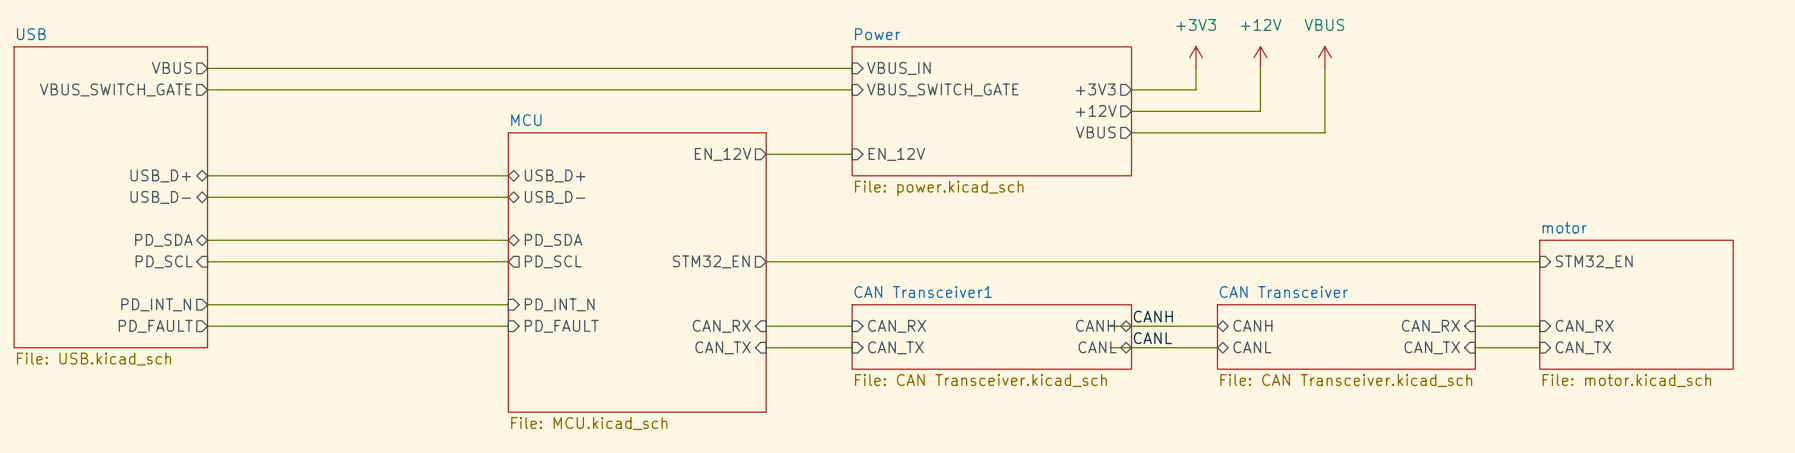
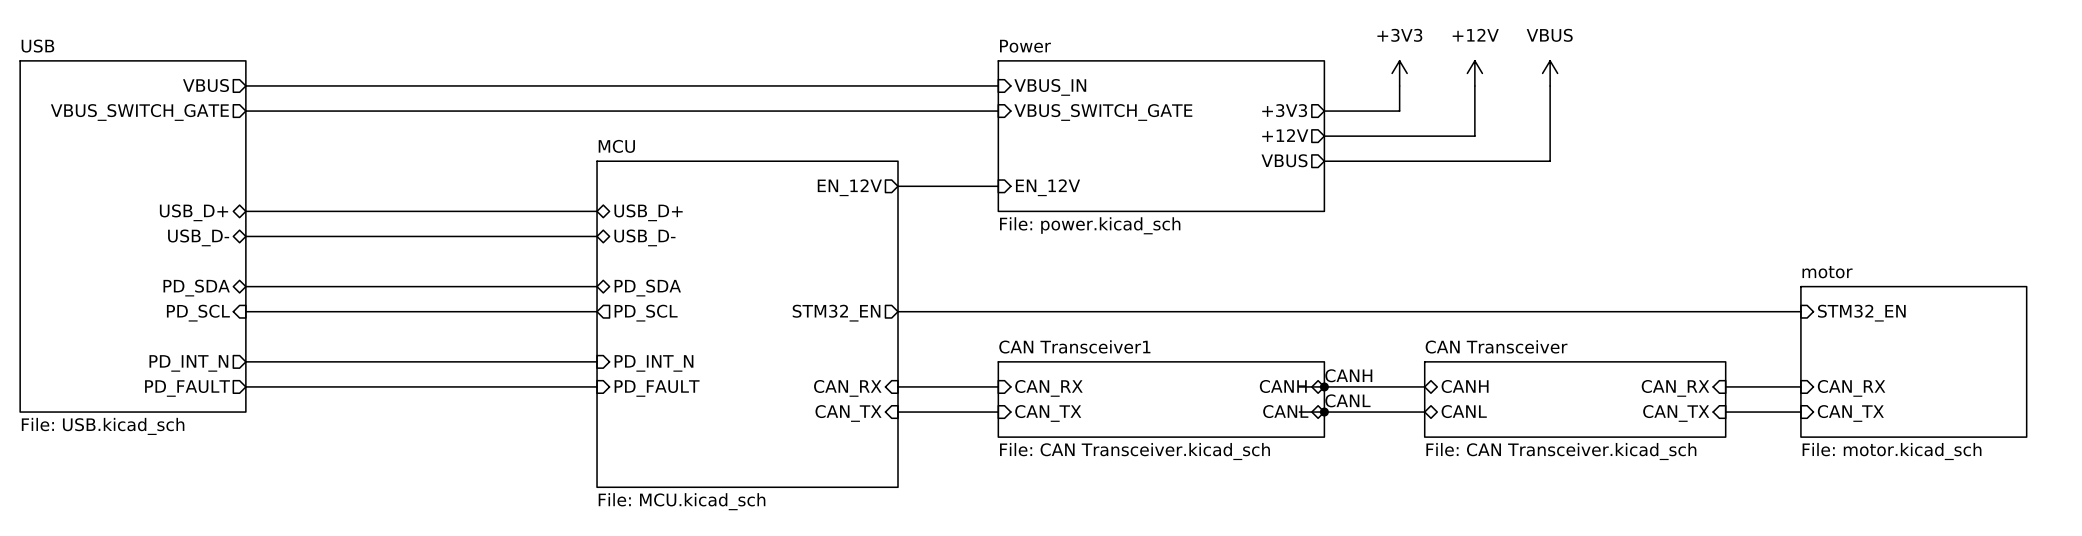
junction: none -> (1324, 386)
junction: none -> (1324, 412)

